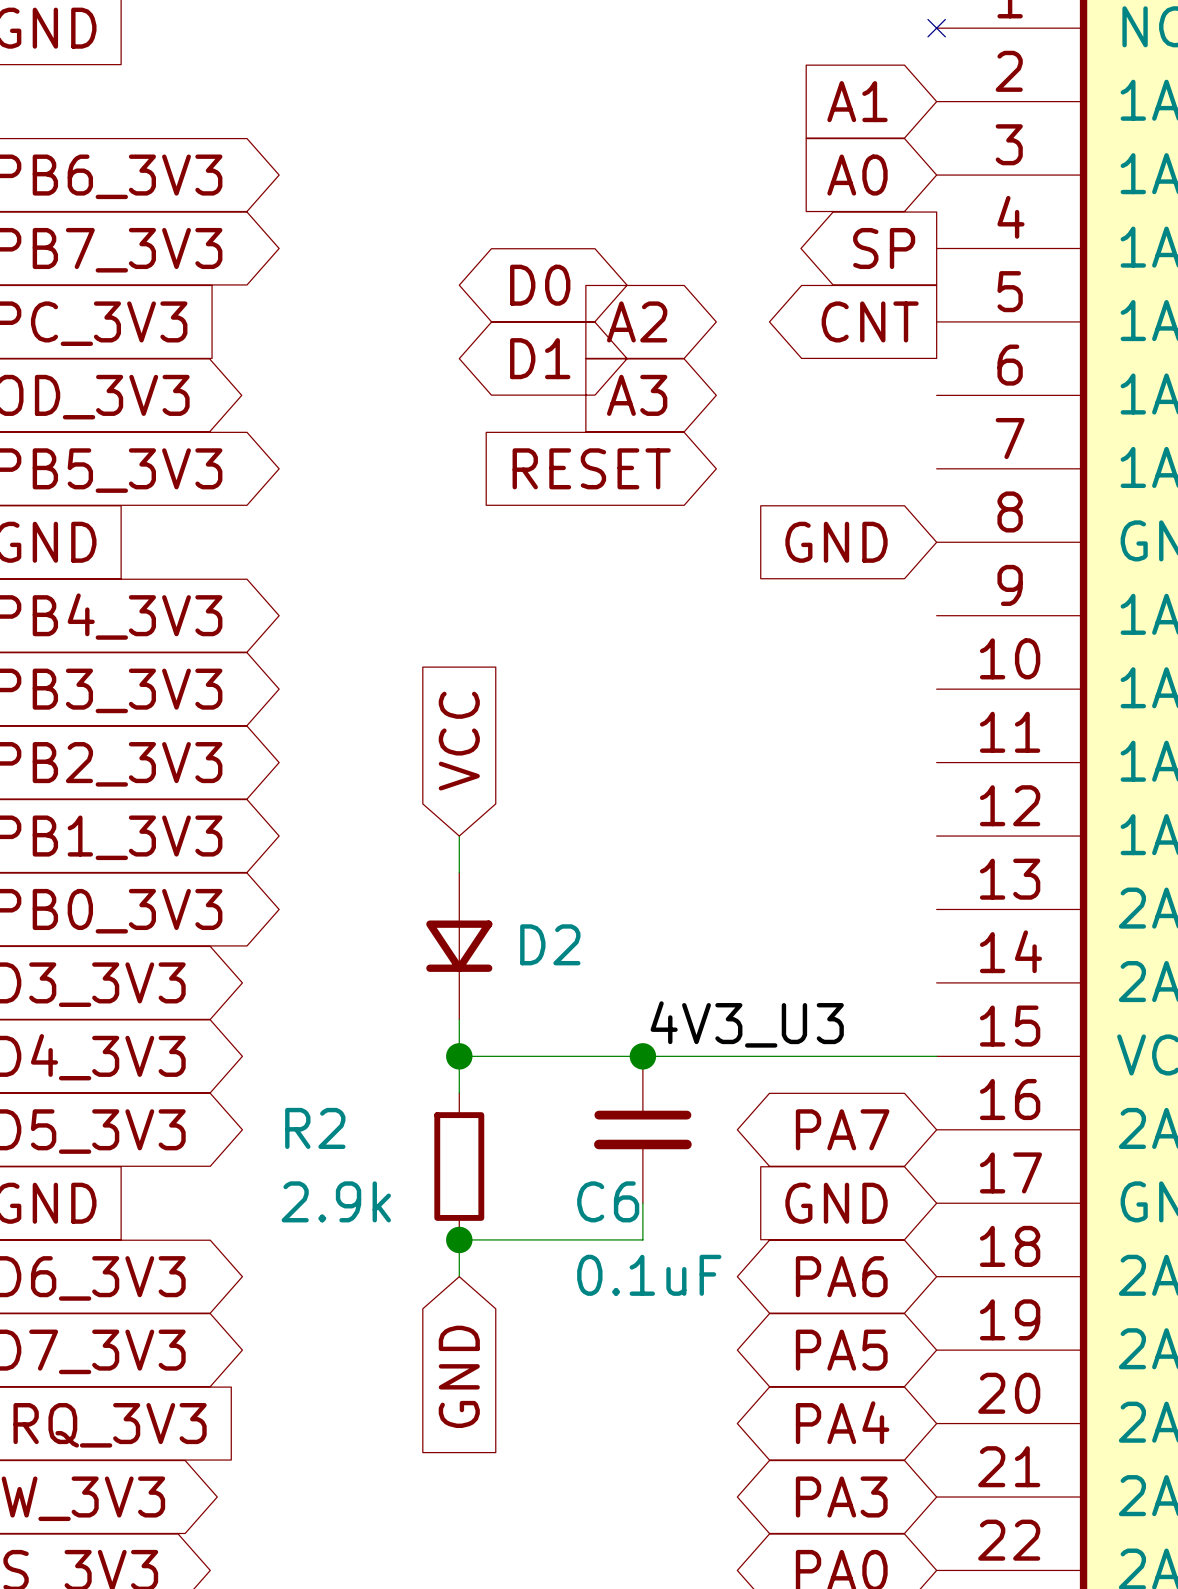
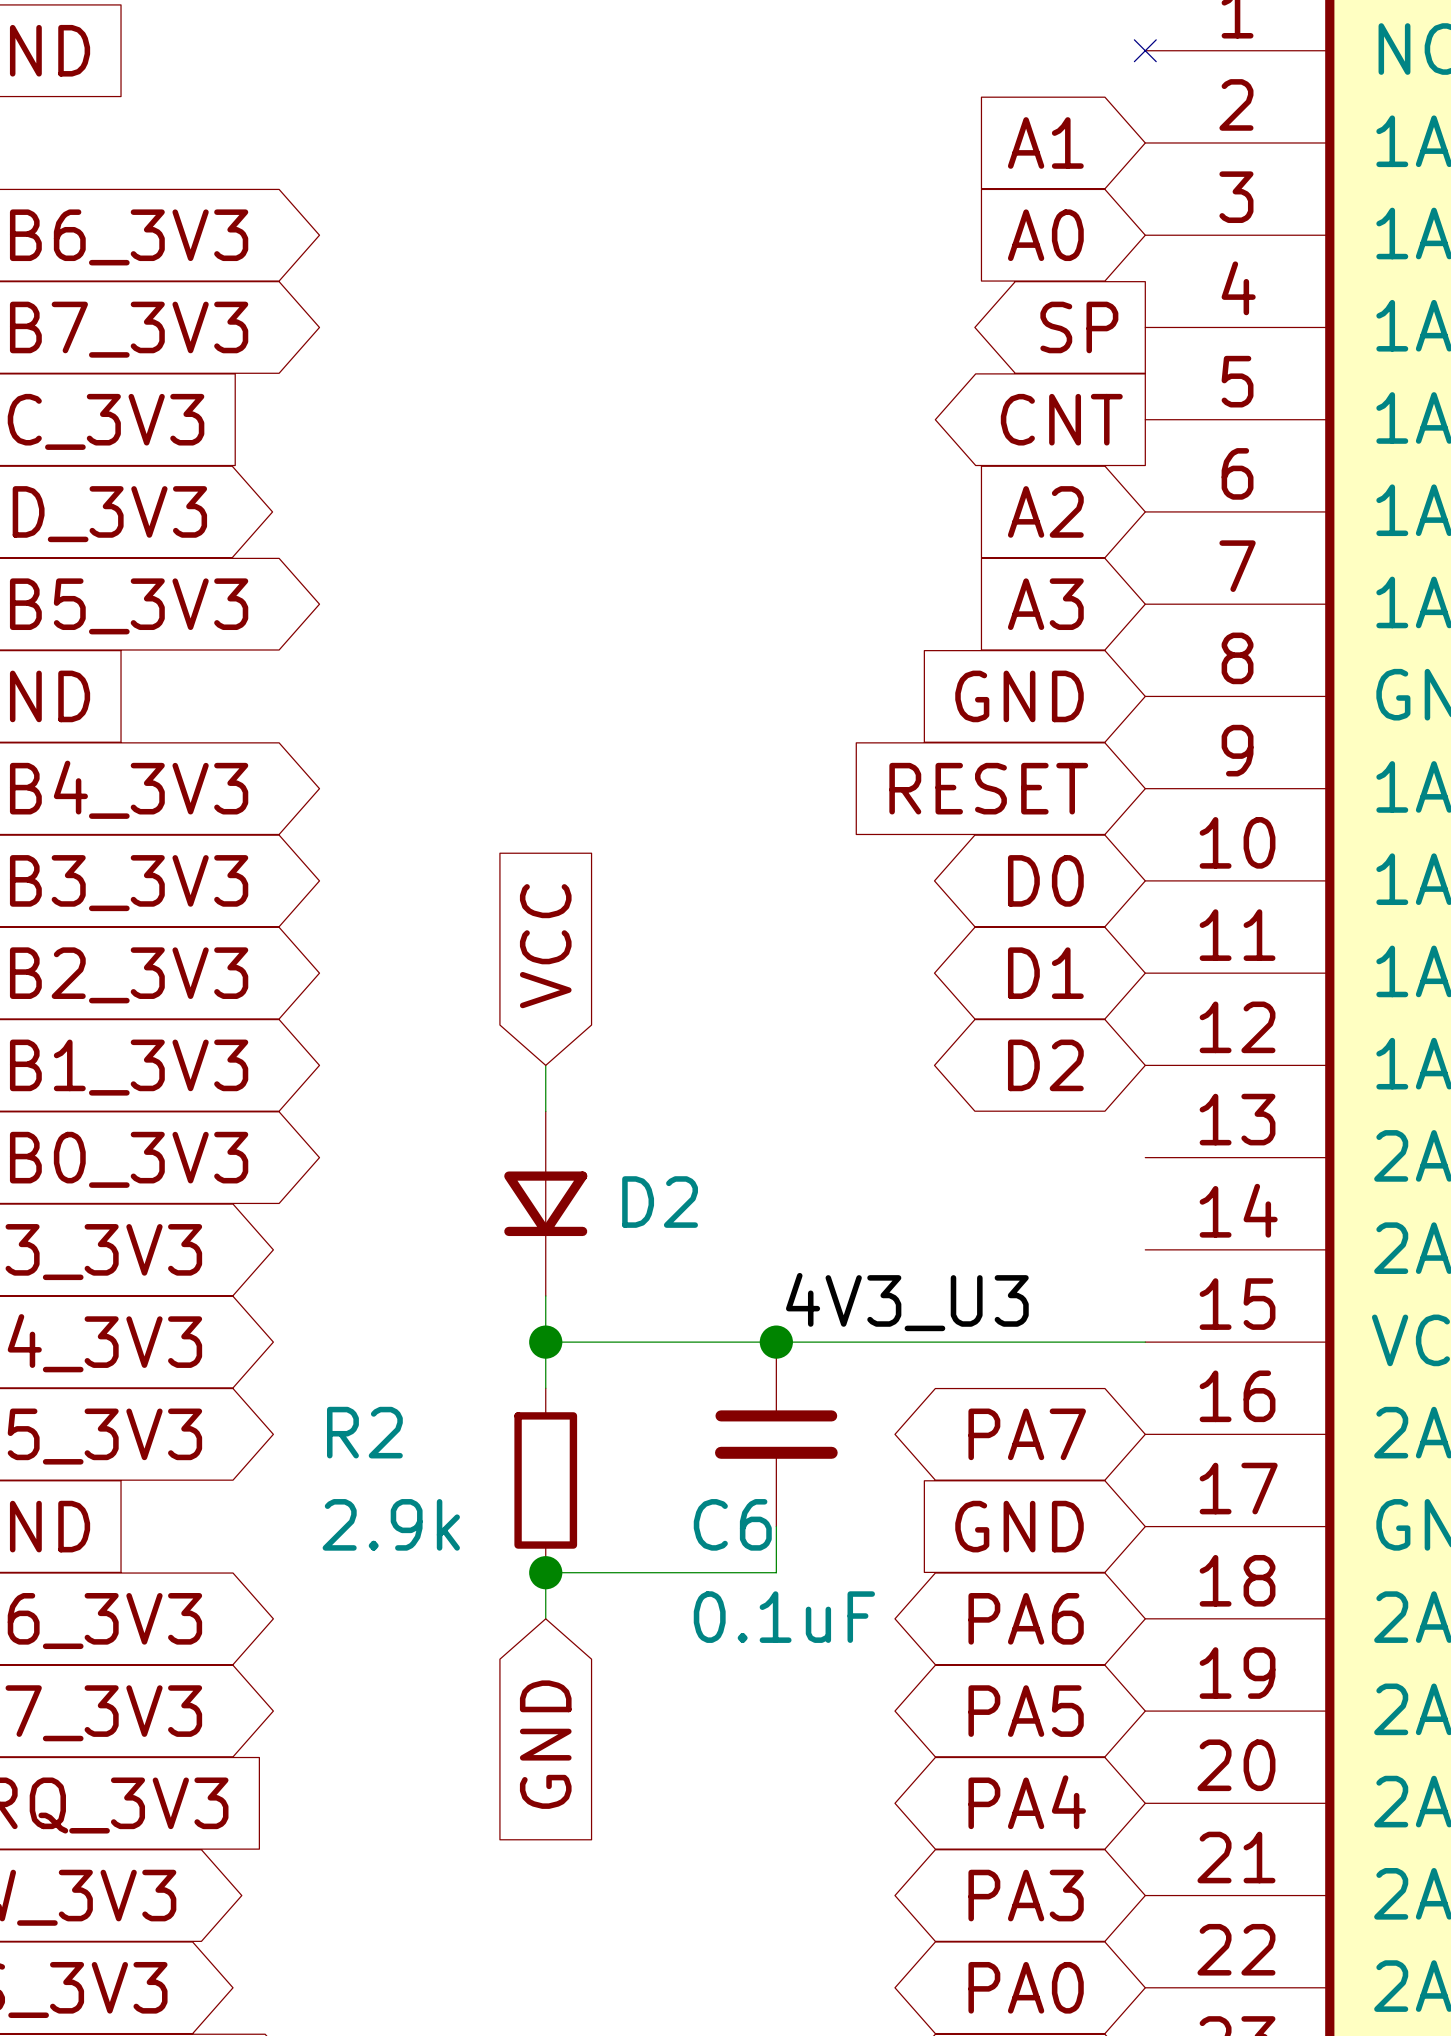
global label rotation: 0° (540, 285) -> 180° (1045, 880)
global label position: D0 (540, 285) -> D0 (1045, 880)
global label position: A2 (637, 321) -> A2 (1045, 511)
global label rotation: 0° (540, 358) -> 180° (1045, 973)
global label position: D1 (540, 358) -> D1 (1045, 973)
global label position: A3 (637, 395) -> A3 (1045, 604)
global label position: RESET (591, 468) -> RESET (988, 788)
global label: none -> D2 (1045, 1065)

